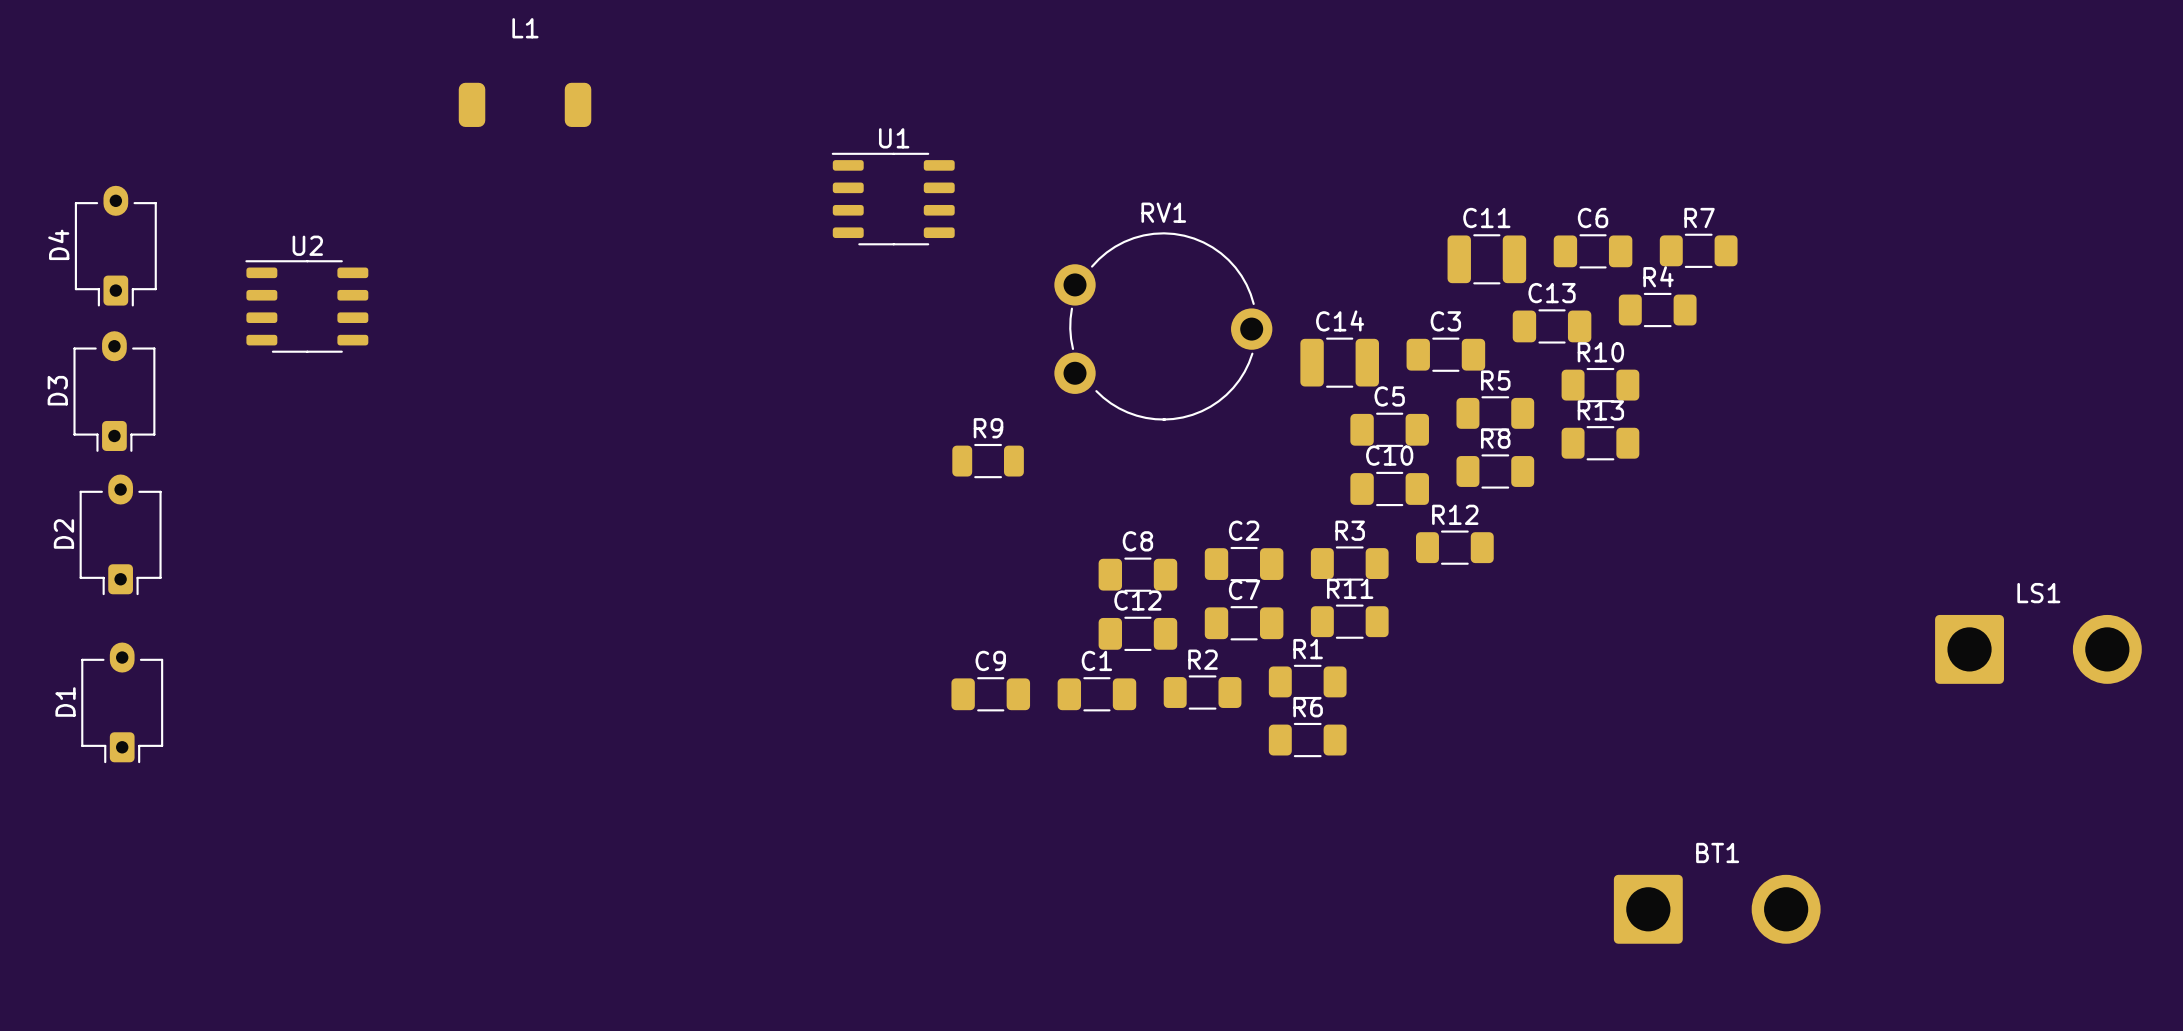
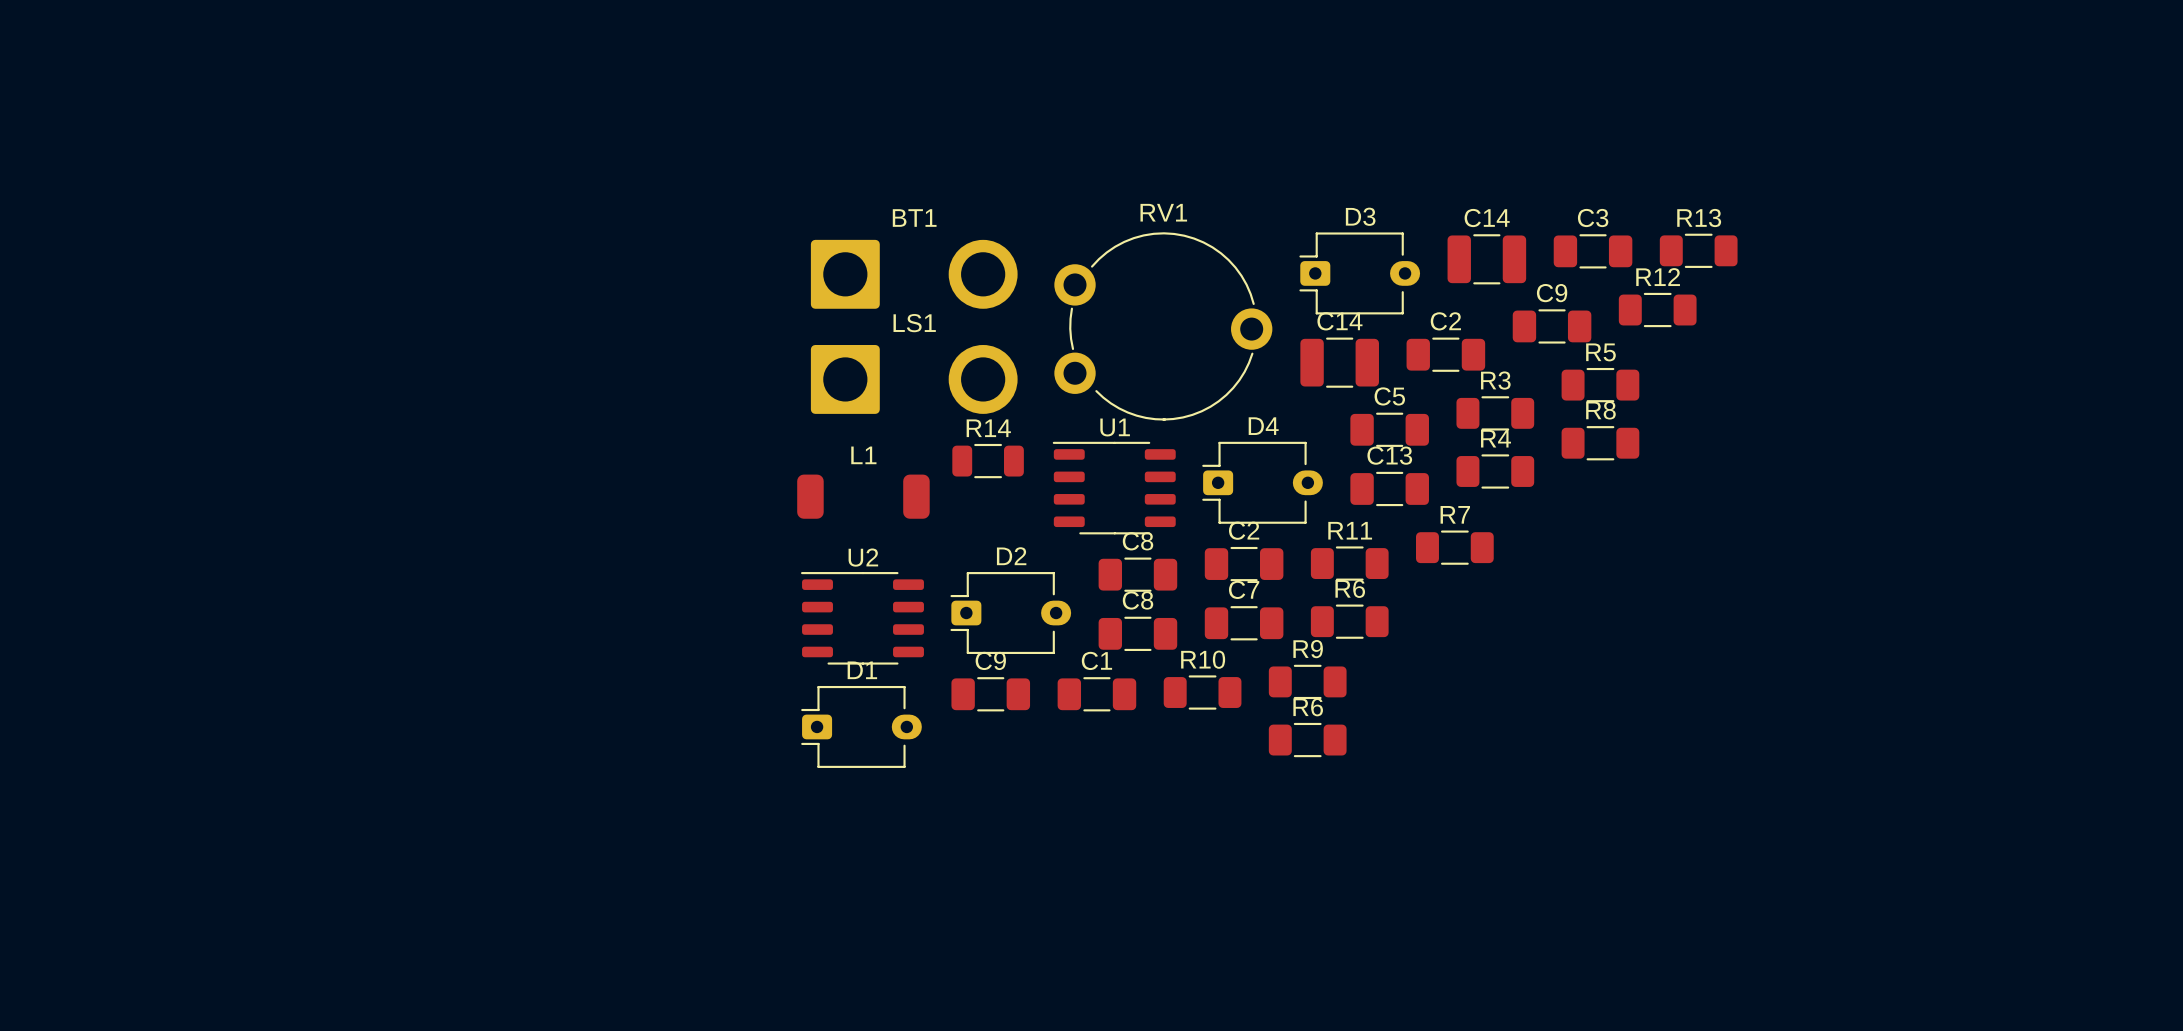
L1 name position: L1 (525, 28) -> L1 (863, 455)
L1 position: (525, 104) -> (863, 496)
U1 position: (893, 199) -> (1114, 488)
C11 name: C11 (1486, 218) -> C14 (1487, 218)
C6 name: C6 (1593, 218) -> C3 (1593, 218)
R7 name: R7 (1699, 218) -> R13 (1699, 218)
D4 rotation: 0° (115, 246) -> 90° clockwise (1262, 482)
D4 position: (115, 246) -> (1262, 482)
R4 name: R4 (1658, 276) -> R12 (1658, 277)
C13 name: C13 (1552, 293) -> C9 (1552, 293)
U2 position: (306, 306) -> (862, 618)
C3 name: C3 (1445, 321) -> C2 (1445, 321)
R10 name: R10 (1600, 352) -> R5 (1600, 352)
R5 name: R5 (1495, 380) -> R3 (1495, 380)
D3 rotation: 0° (114, 391) -> 90° clockwise (1359, 273)
D3 position: (114, 391) -> (1359, 273)
R13 name: R13 (1600, 410) -> R8 (1600, 410)
R9 name: R9 (988, 428) -> R14 (988, 428)
R8 name: R8 (1495, 438) -> R4 (1496, 438)
C10 name: C10 (1389, 455) -> C13 (1389, 455)
R12 name: R12 (1455, 514) -> R7 (1455, 514)
R3 name: R3 (1350, 530) -> R11 (1350, 530)
D2 rotation: 0° (120, 534) -> 90° clockwise (1010, 613)
D2 position: (120, 534) -> (1010, 613)
R11 name: R11 (1350, 588) -> R6 (1350, 588)
C12 name: C12 (1137, 600) -> C8 (1138, 600)
R1 name: R1 (1308, 649) -> R9 (1308, 649)
LS1 position: (2038, 649) -> (914, 379)
R2 name: R2 (1203, 659) -> R10 (1203, 659)
D1 rotation: 0° (122, 702) -> 90° clockwise (861, 726)
D1 position: (122, 702) -> (861, 726)
BT1 position: (1717, 909) -> (914, 274)

